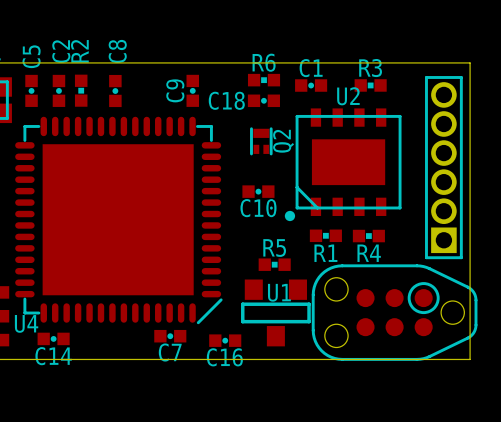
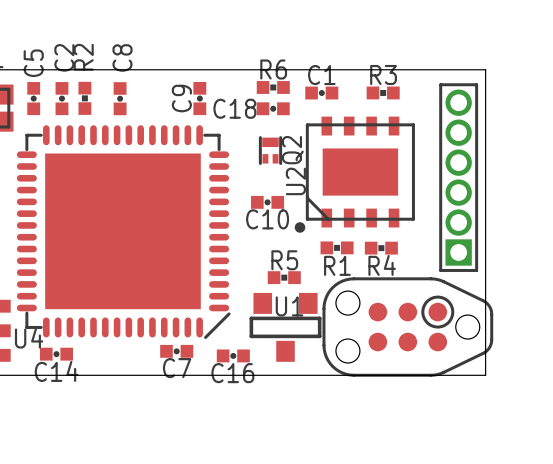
U2 name rotation: 0° (348, 96) -> 90° counterclockwise (295, 181)
U2 name position: U2 (348, 96) -> U2 (295, 181)

